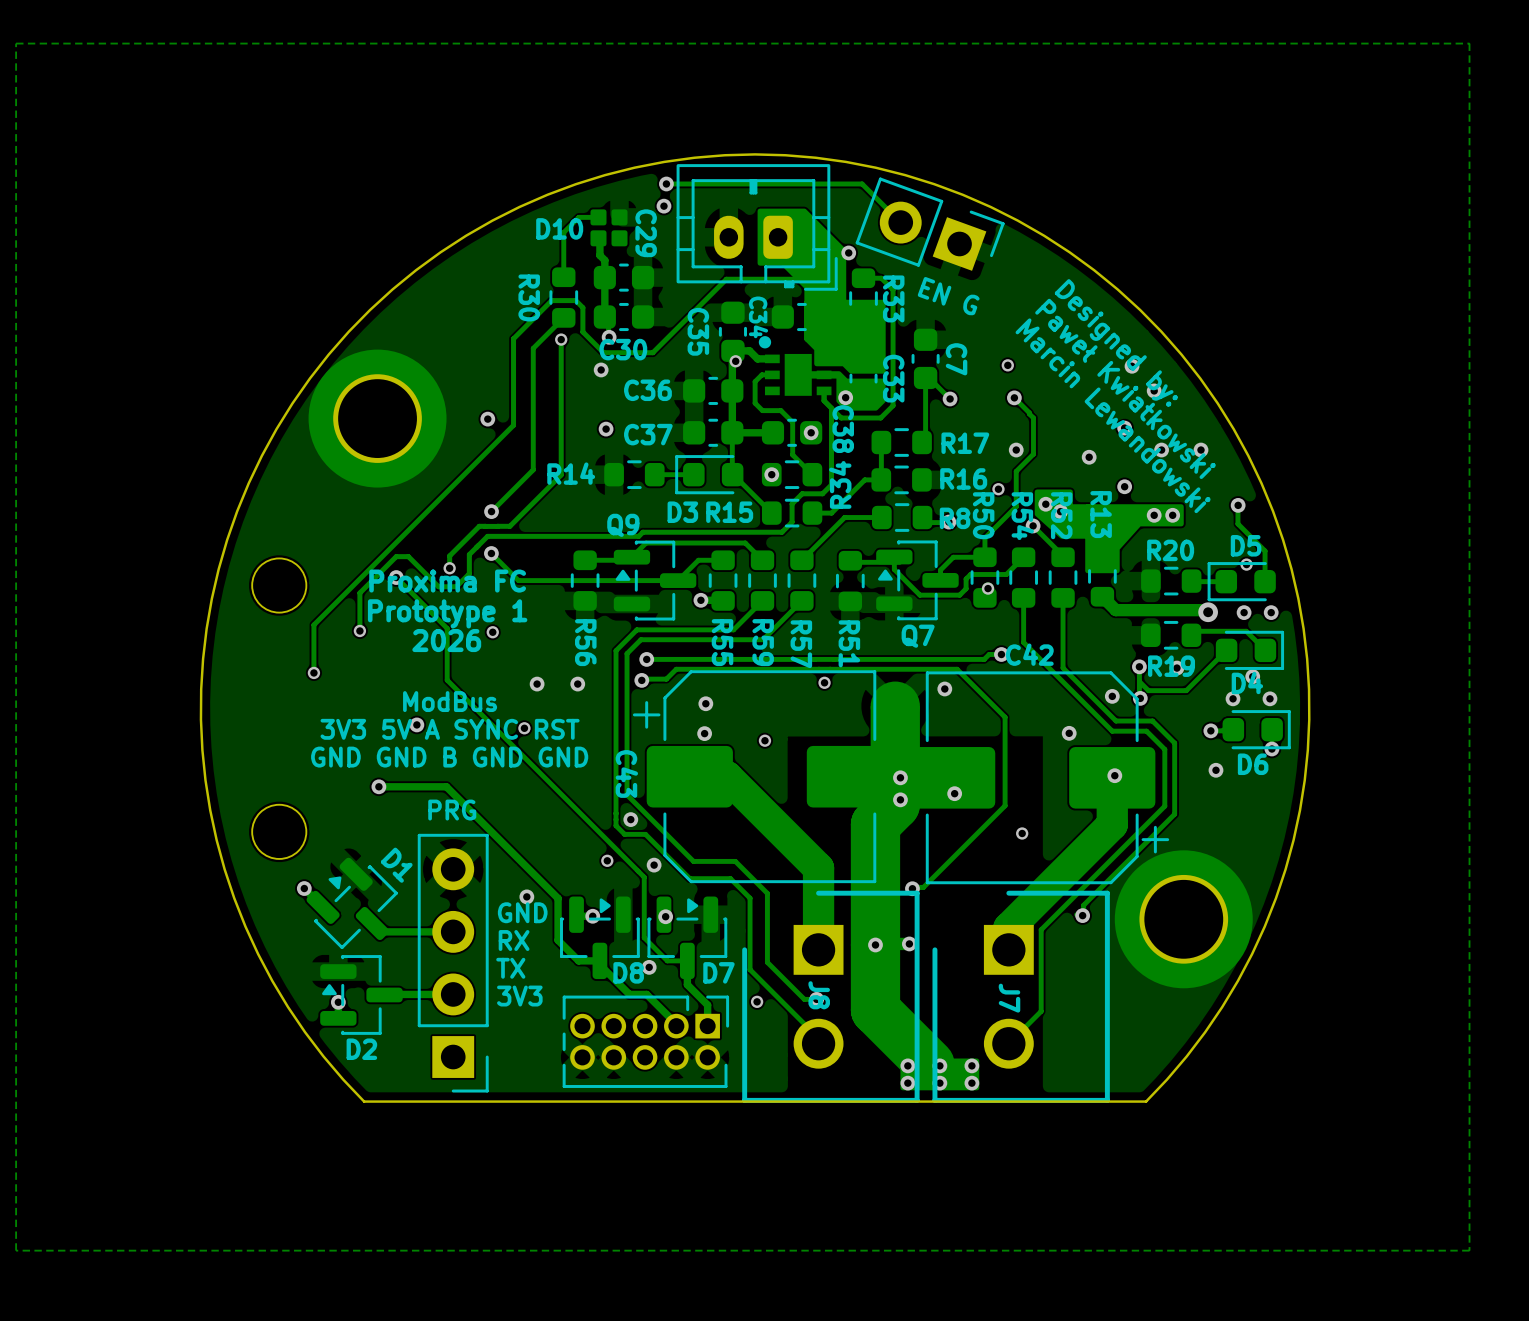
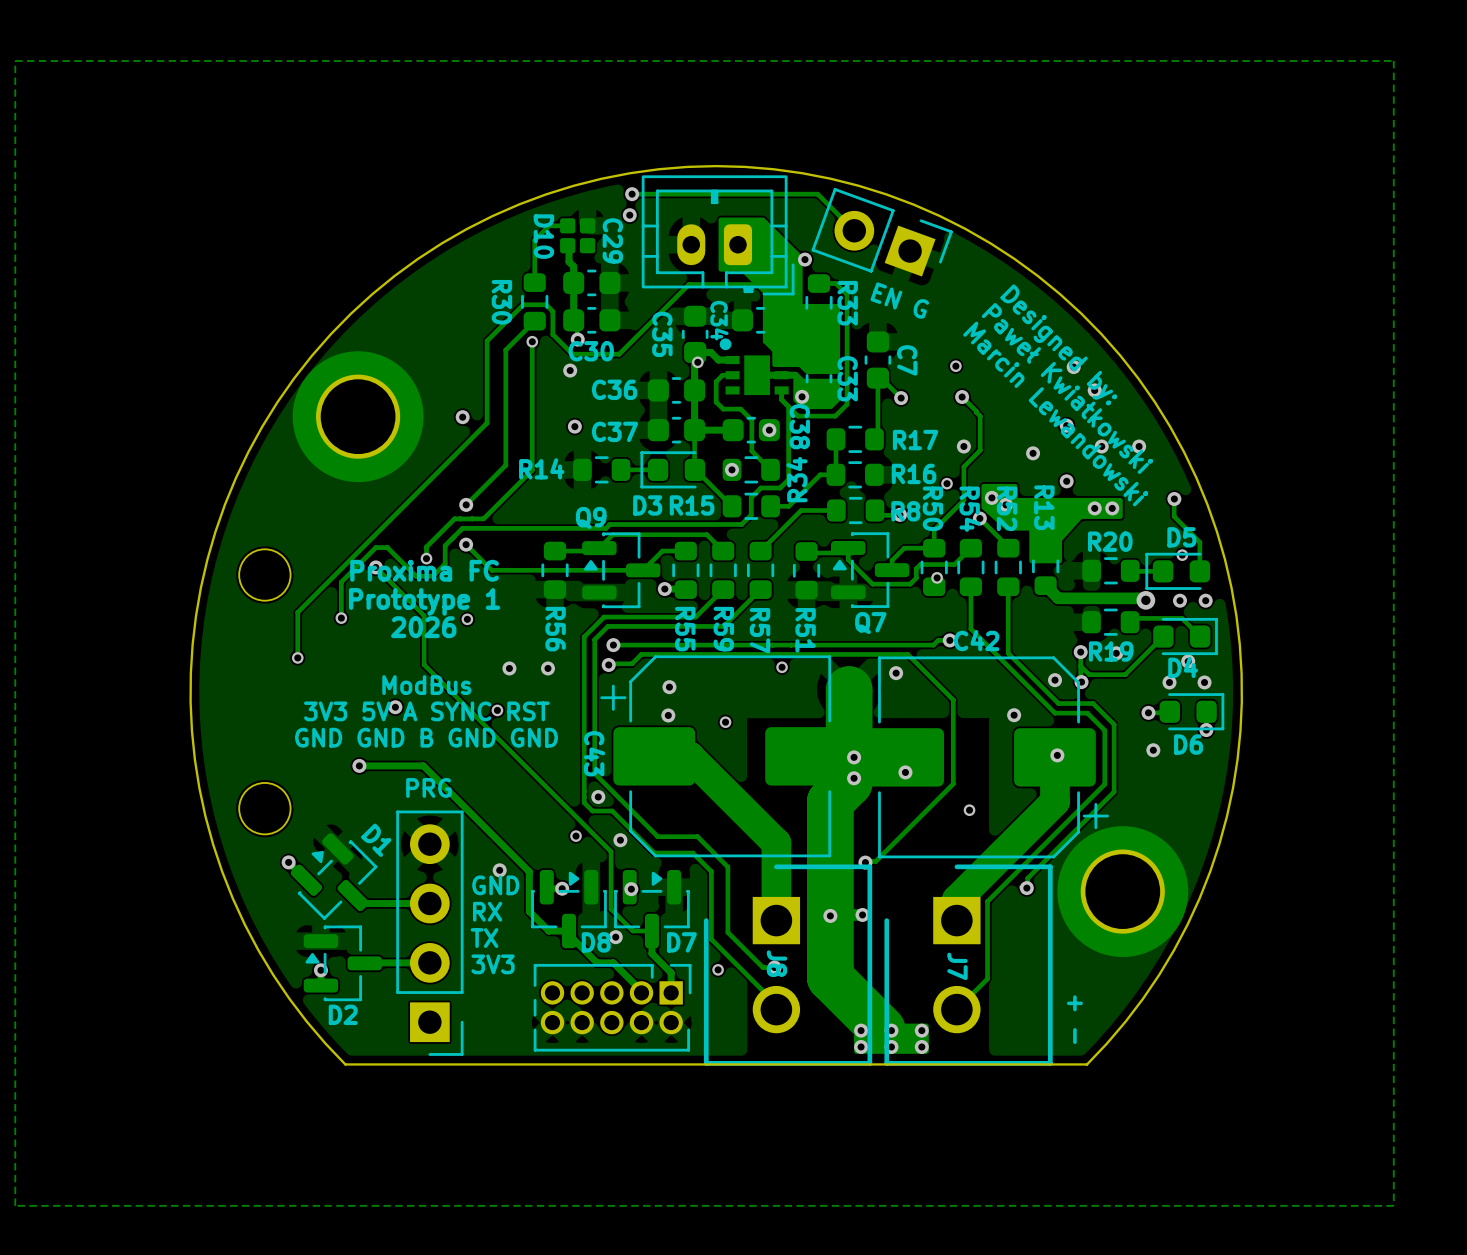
D10 name rotation: 0° (559, 228) -> 90° clockwise (543, 236)
text: none -> + - (1074, 1019)

